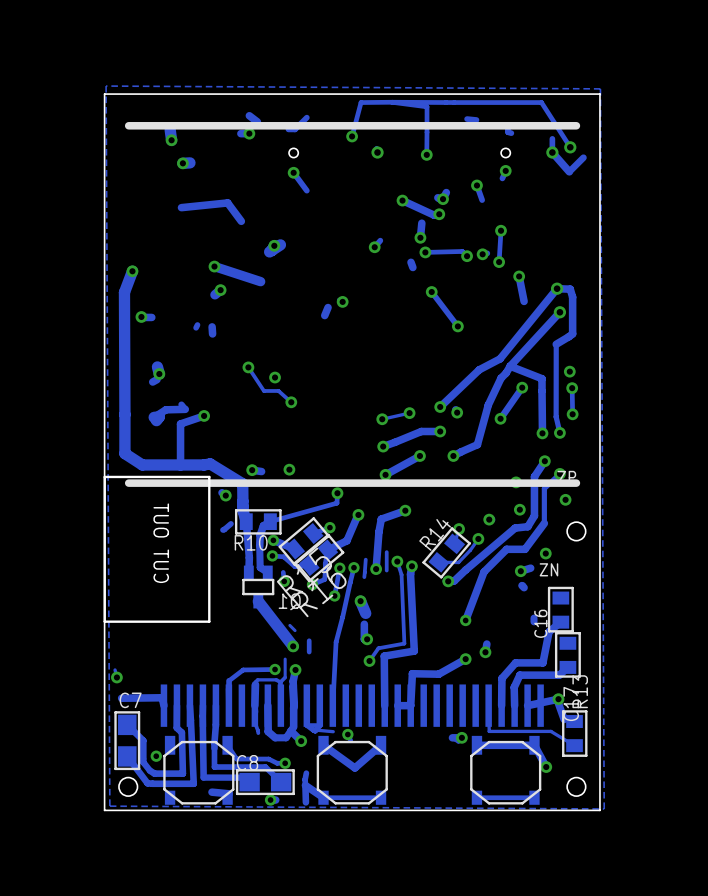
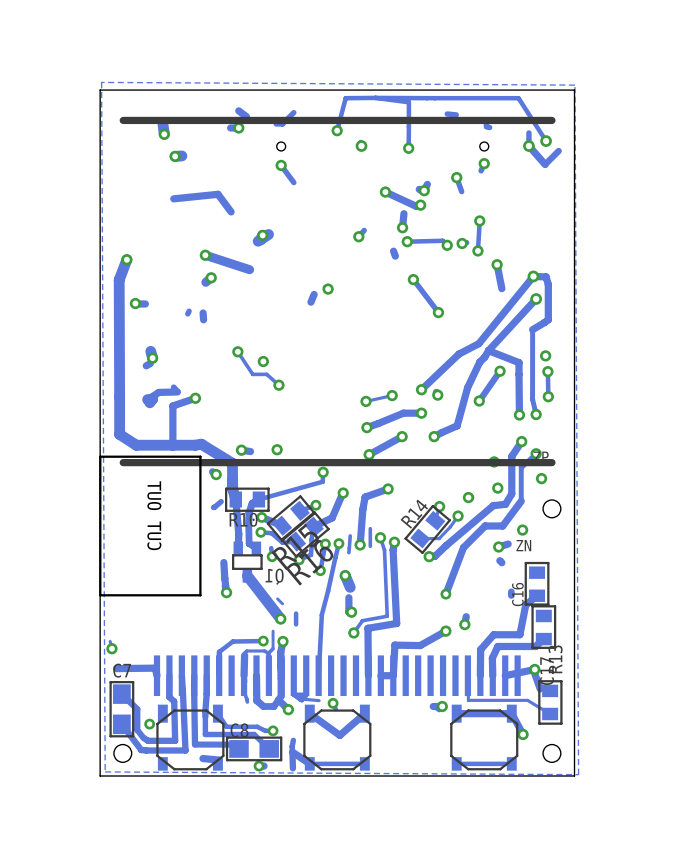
track: none -> (223, 562) (226, 592) (225, 586)
via: none -> (226, 592)

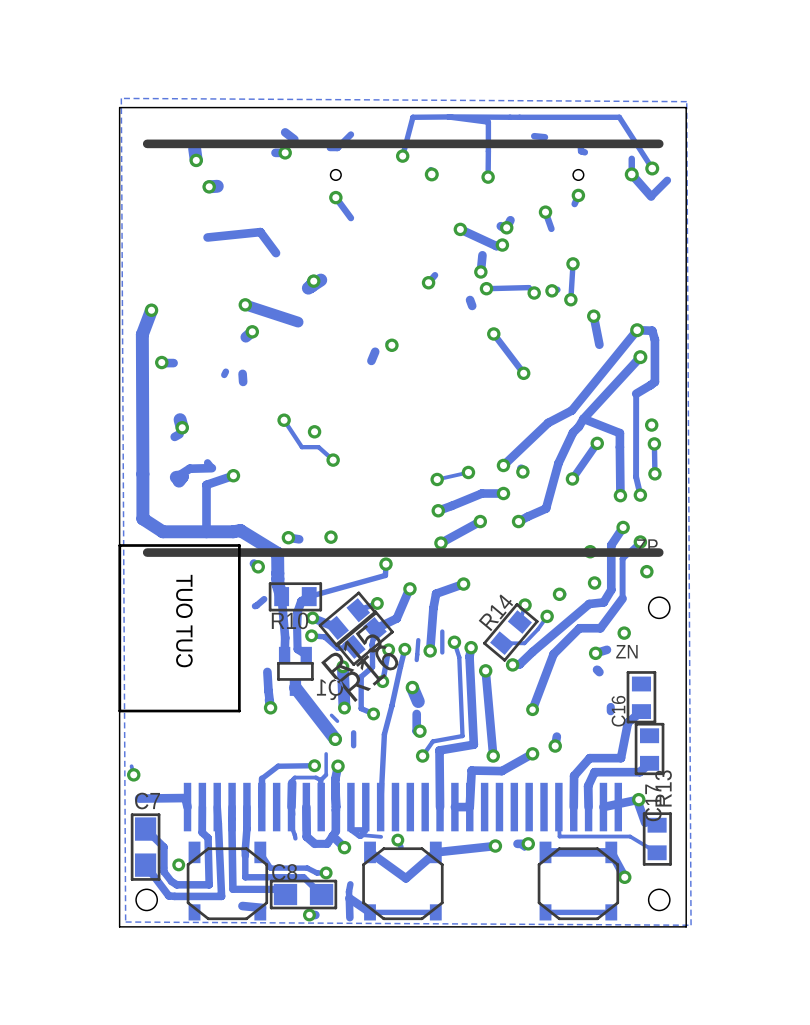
track: (311, 543) (310, 554) (299, 559) -> (372, 648) (372, 667) (361, 676) (361, 708) (373, 713)
track: (271, 548) (272, 556) -> none
via: (272, 556) -> none
track: none -> (342, 666) (344, 708)
via: none -> (342, 666)
via: (299, 559) -> none
track: none -> (485, 670) (493, 756)
via: none -> (485, 670)
via: none -> (344, 708)
via: none -> (373, 713)
via: none -> (493, 756)
track: none -> (495, 846) (435, 852)
via: none -> (495, 846)

